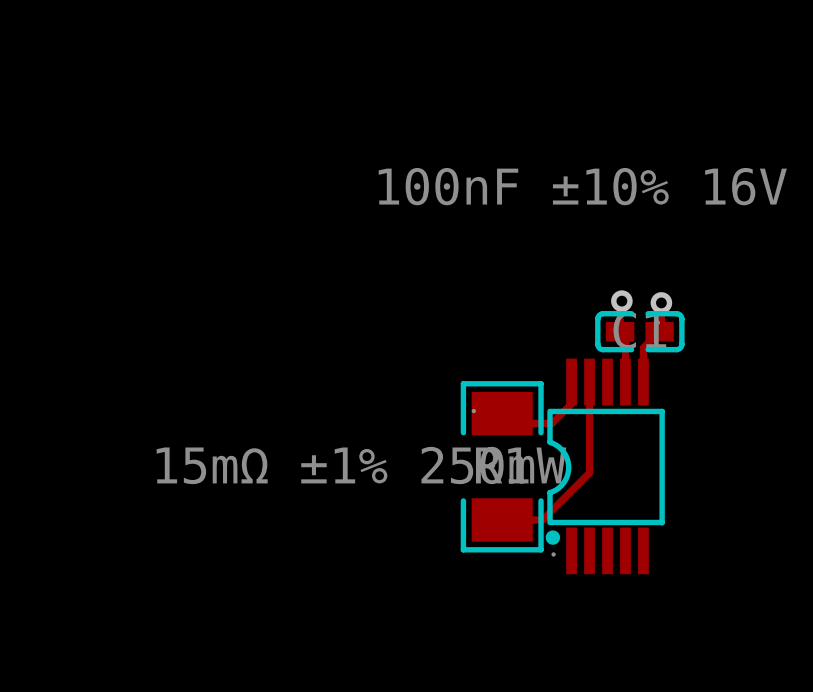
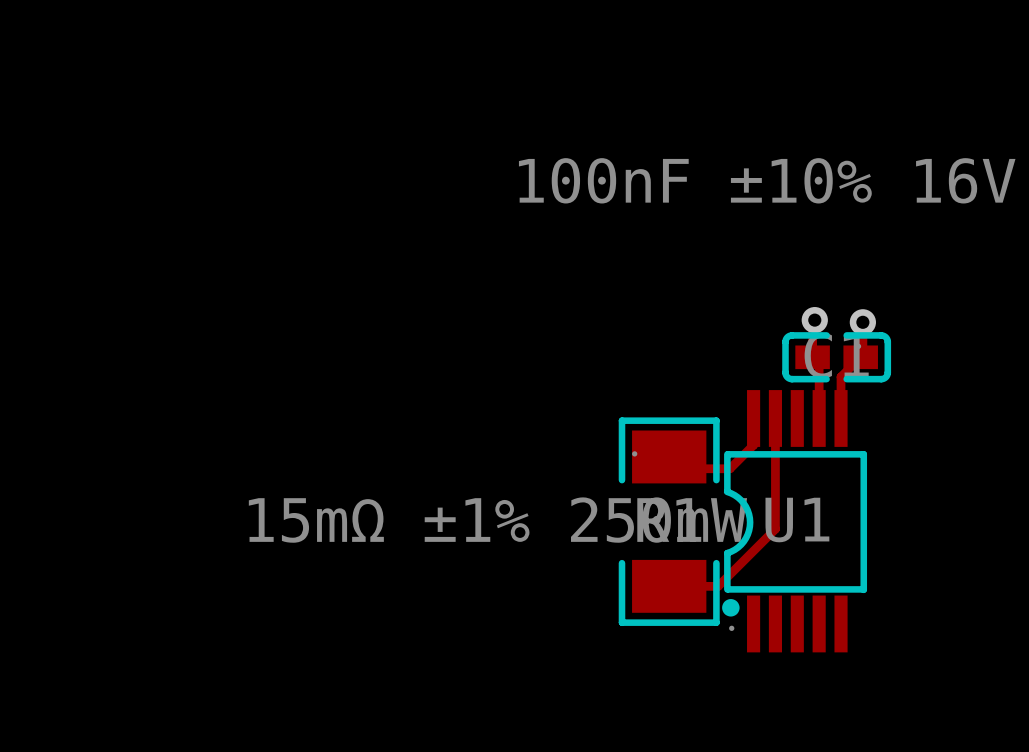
U1 name: none -> U1 (797, 520)

